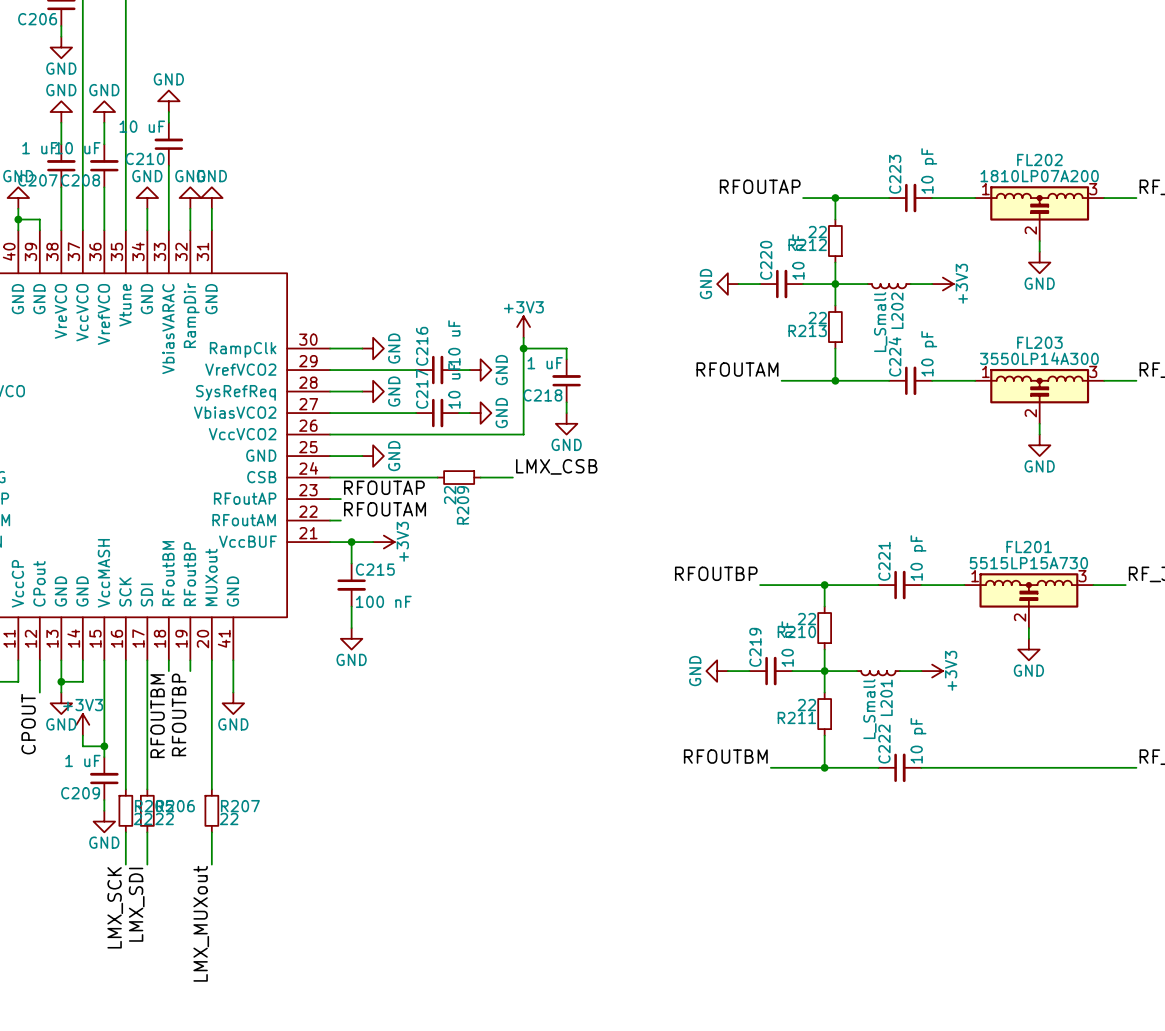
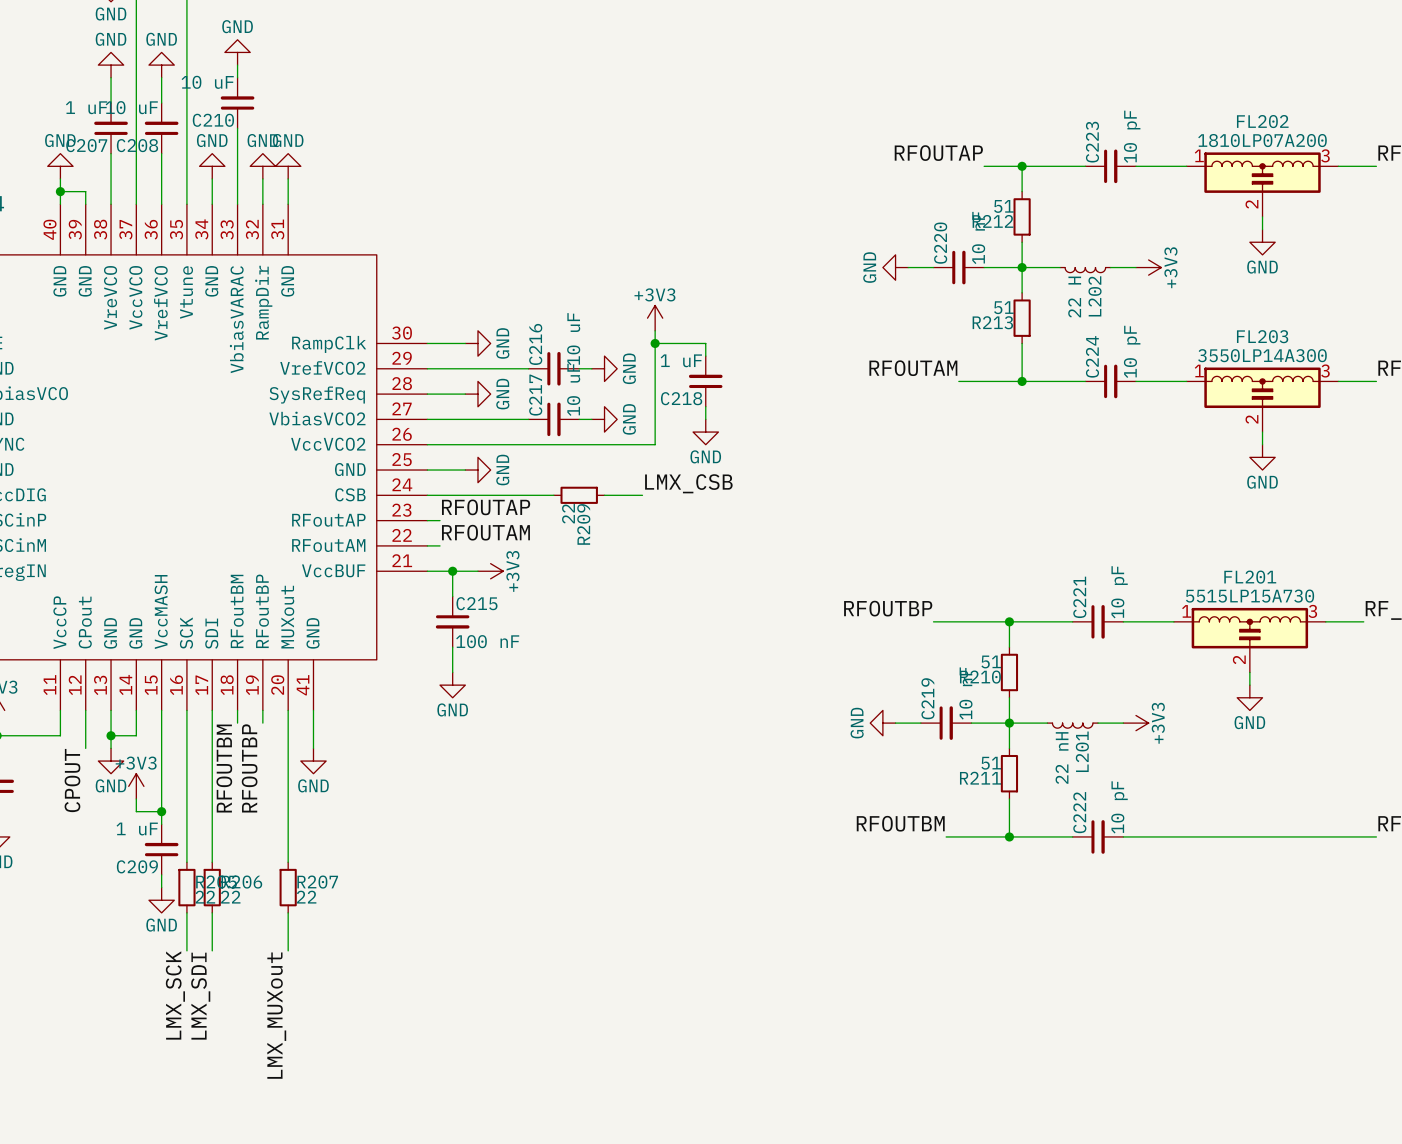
R212 value: 22 (817, 232) -> 51 (1003, 206)
R213 value: 22 (817, 318) -> 51 (1003, 307)
L202 value: L_Small (880, 322) -> 22 H (1074, 297)
R210 value: 22 (806, 619) -> 51 (991, 661)
R211 value: 22 (806, 705) -> 51 (991, 763)
L201 value: L_Small (869, 709) -> 22 nH (1062, 758)

